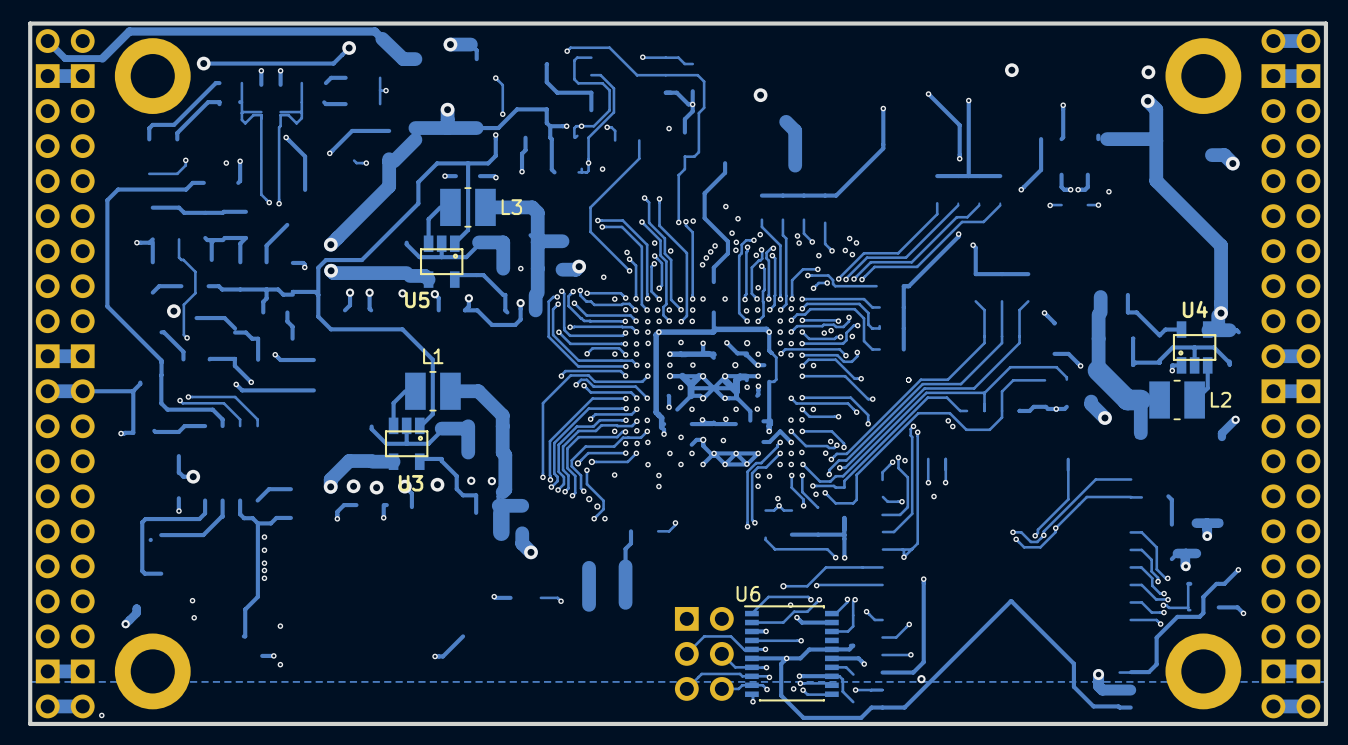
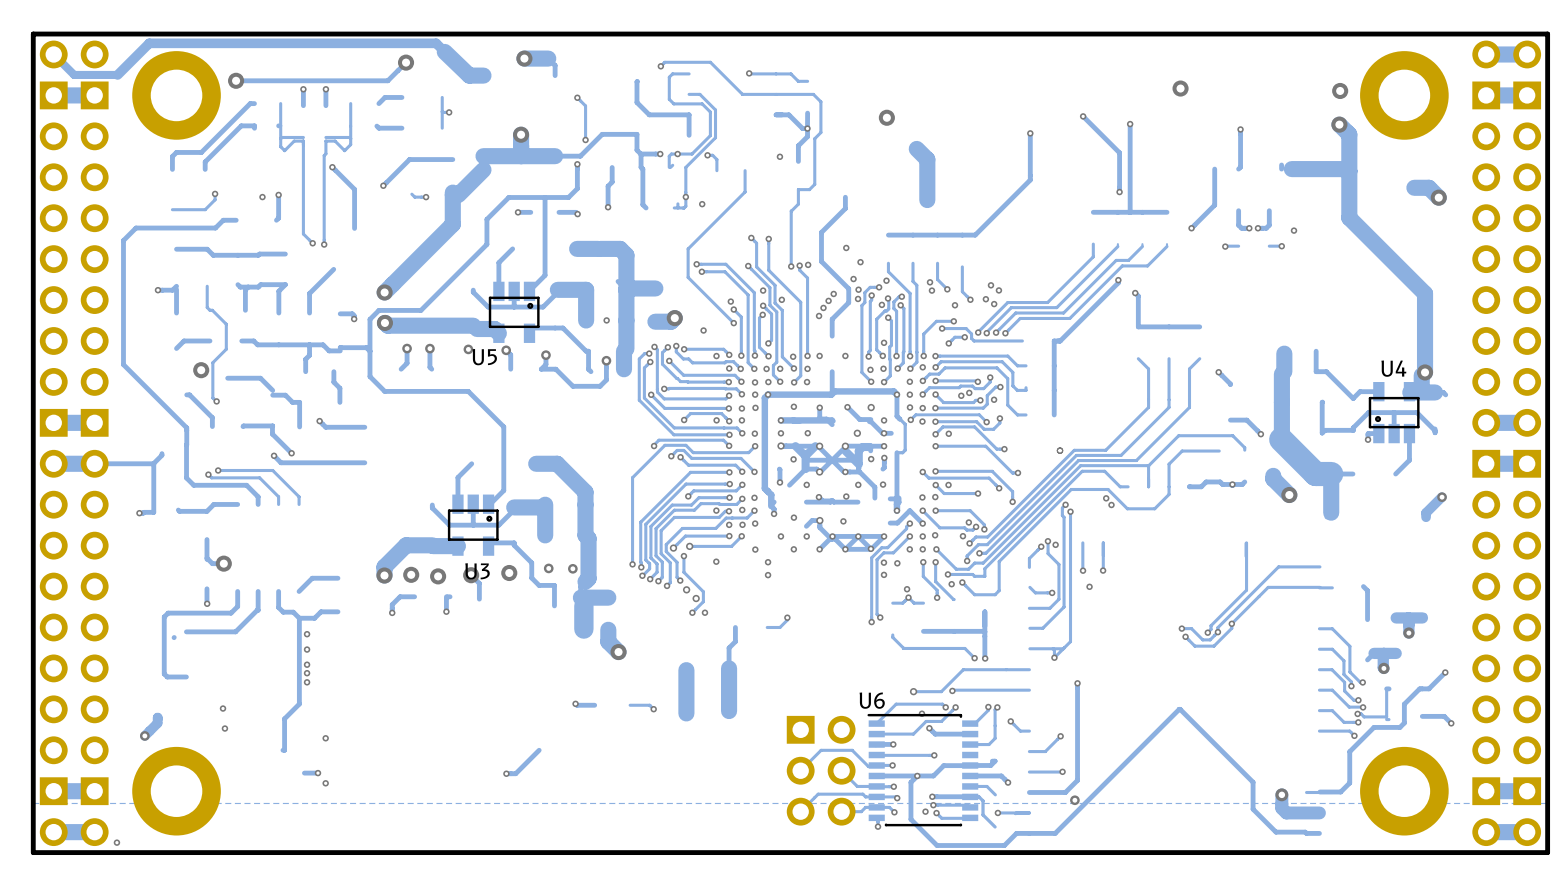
L3: (467, 207) -> none
L1: (432, 391) -> none
L2: (1177, 400) -> none

